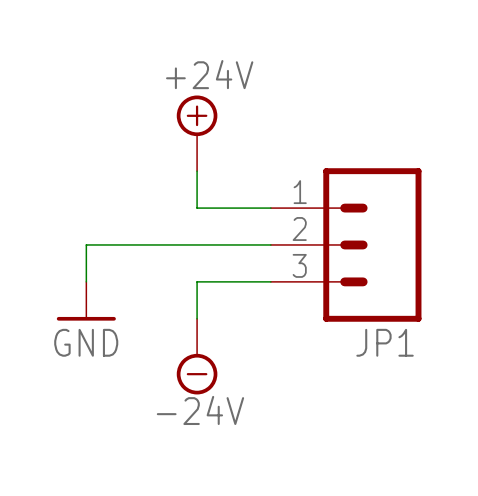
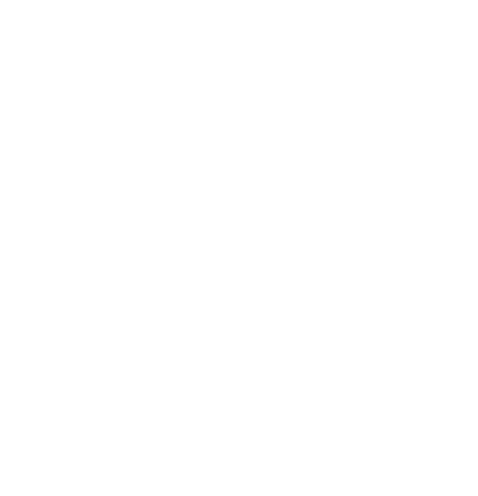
power symbol: +24V (197, 133) -> none
wire: (197, 171) (197, 208) (270, 208) -> none
wire: (270, 244) (86, 244) (86, 281) -> none
JP1: (346, 244) -> none
wire: (270, 281) (197, 281) (197, 318) -> none
power symbol: GND (86, 301) -> none
power symbol: -24V (197, 356) -> none

